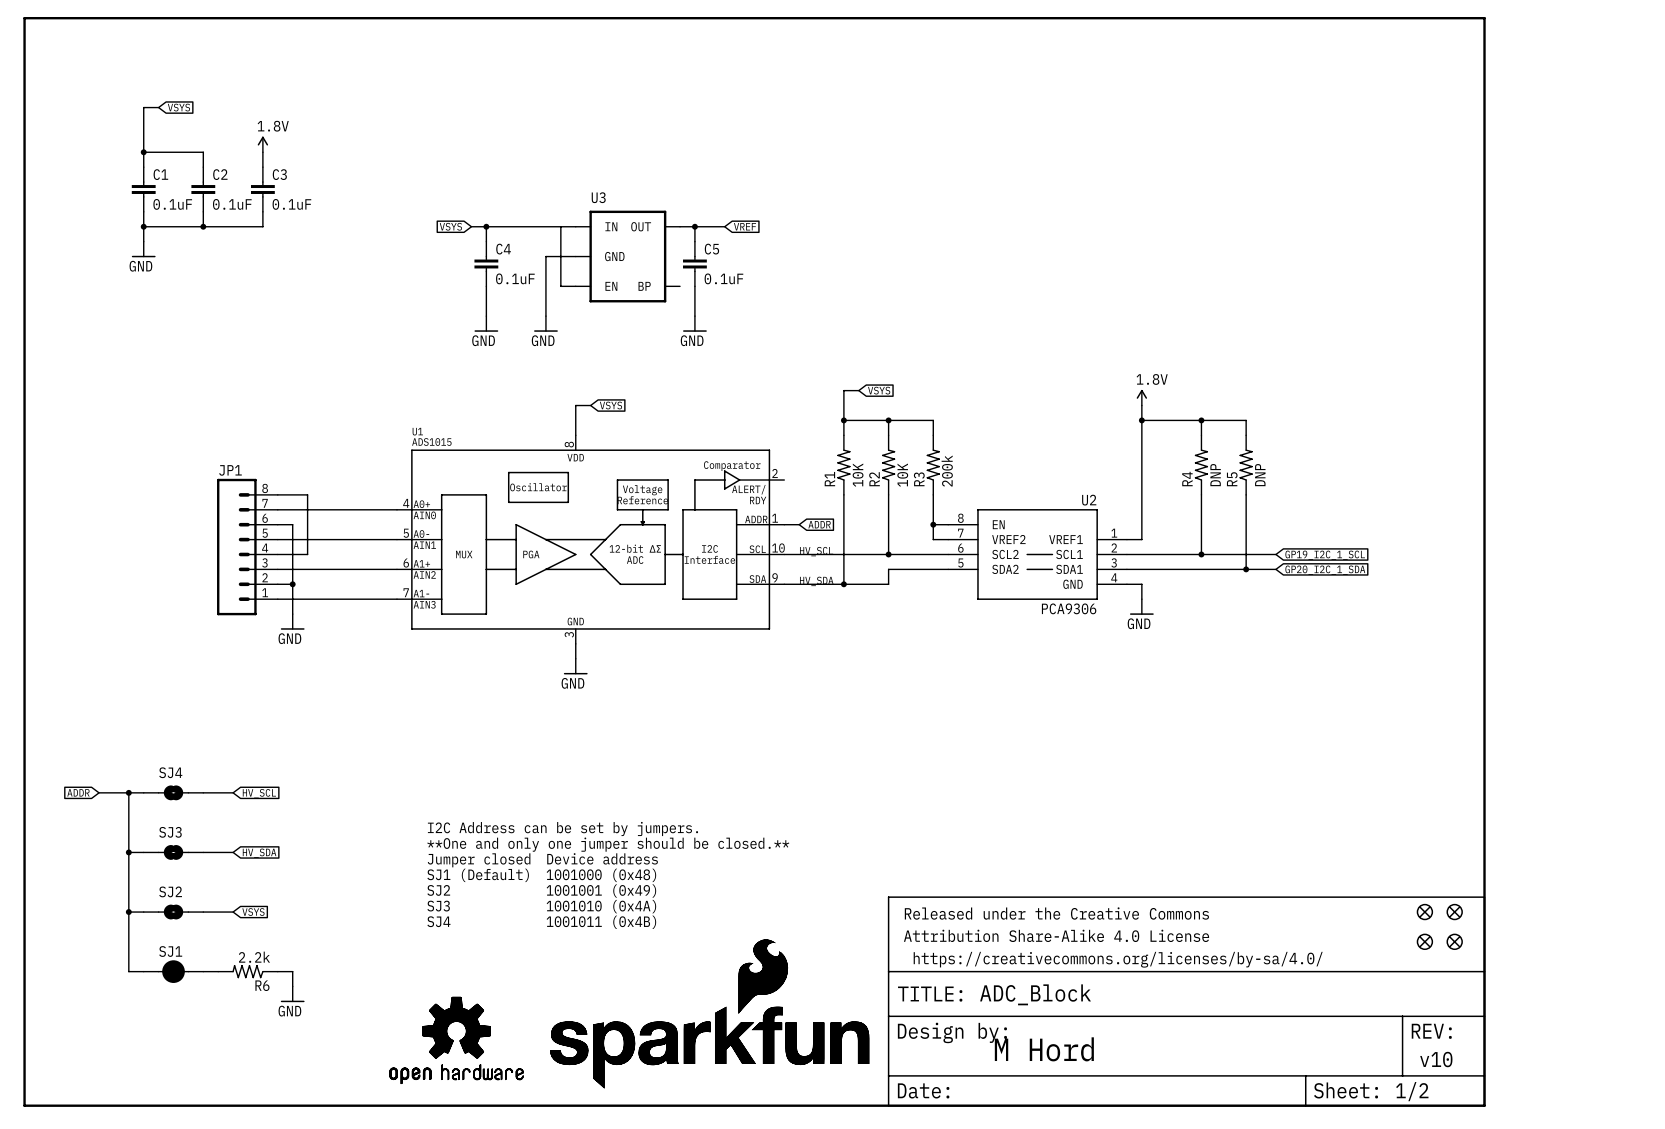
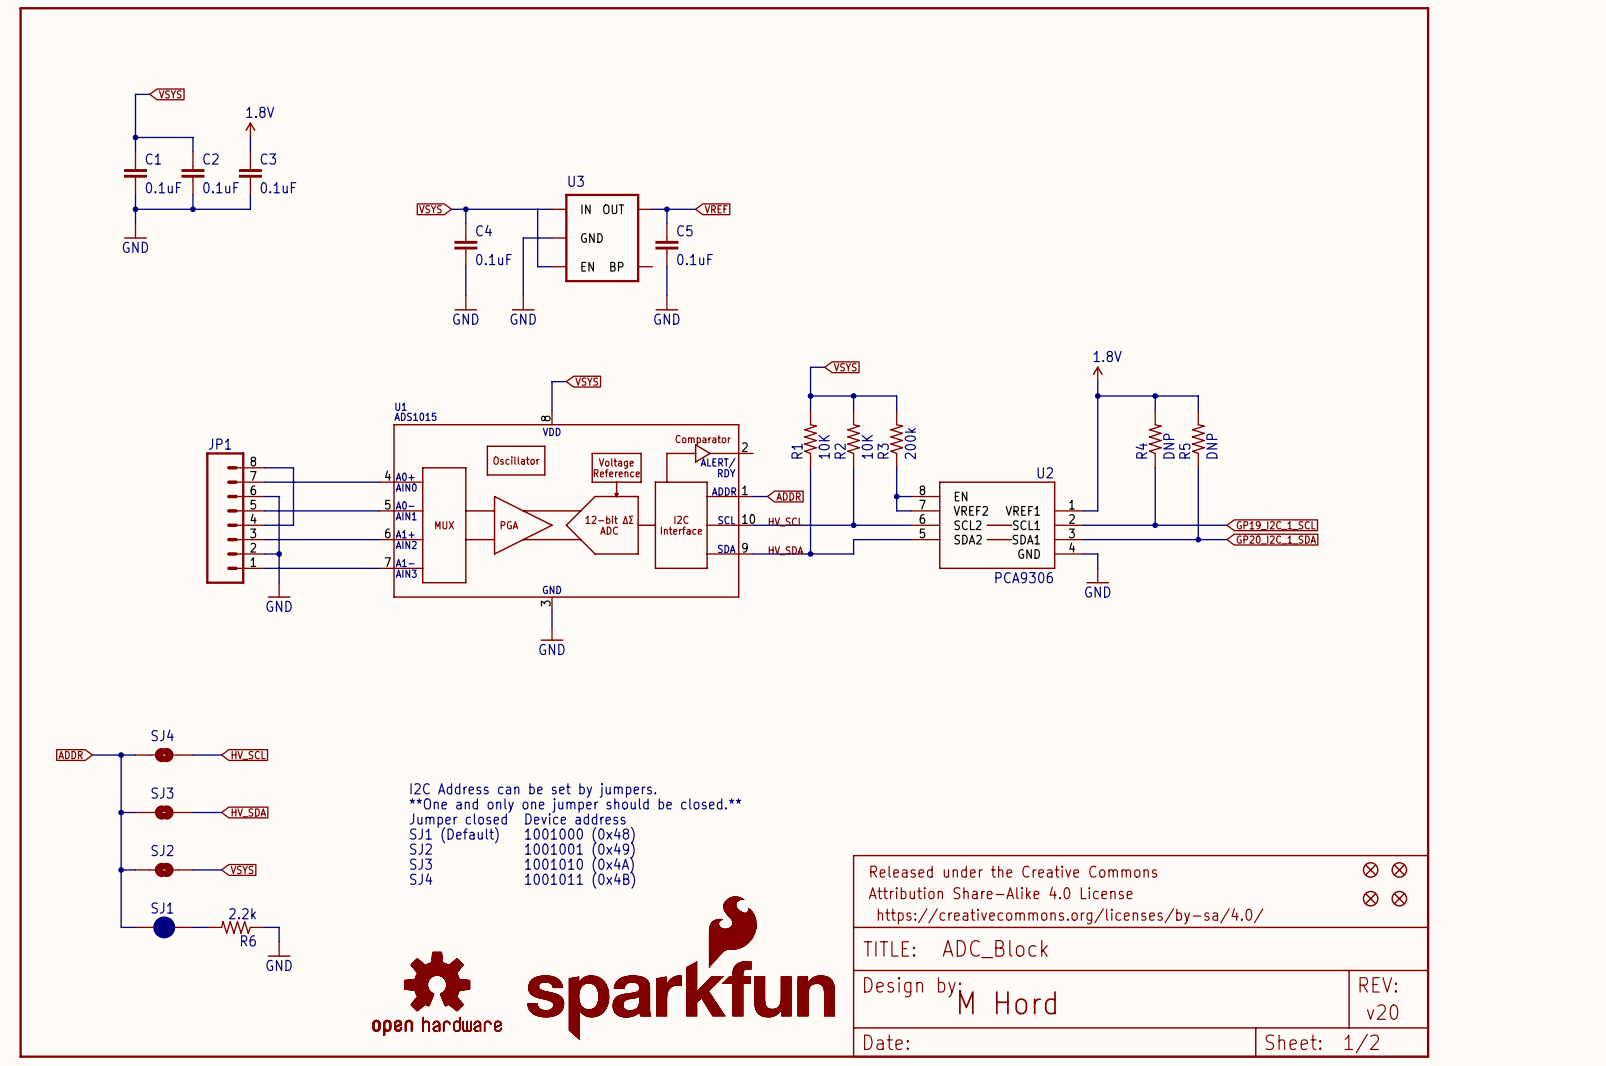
text: v10 (1436, 1059) -> v20 (1382, 1012)

